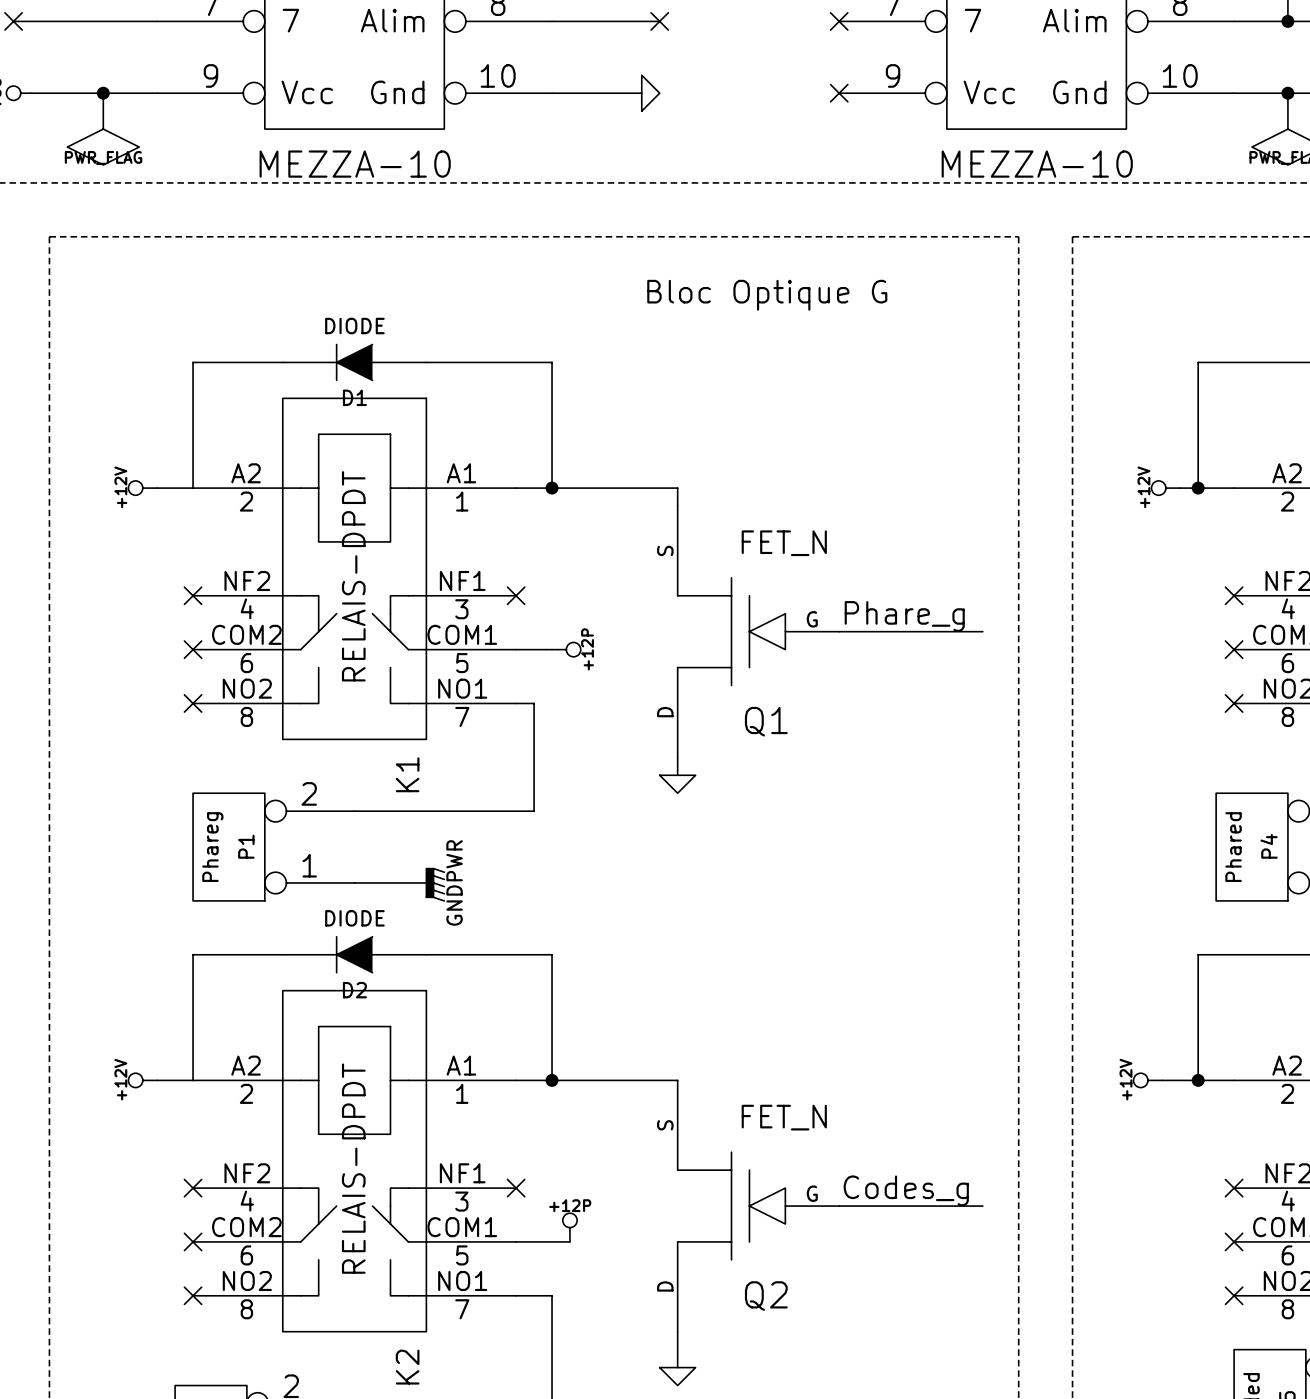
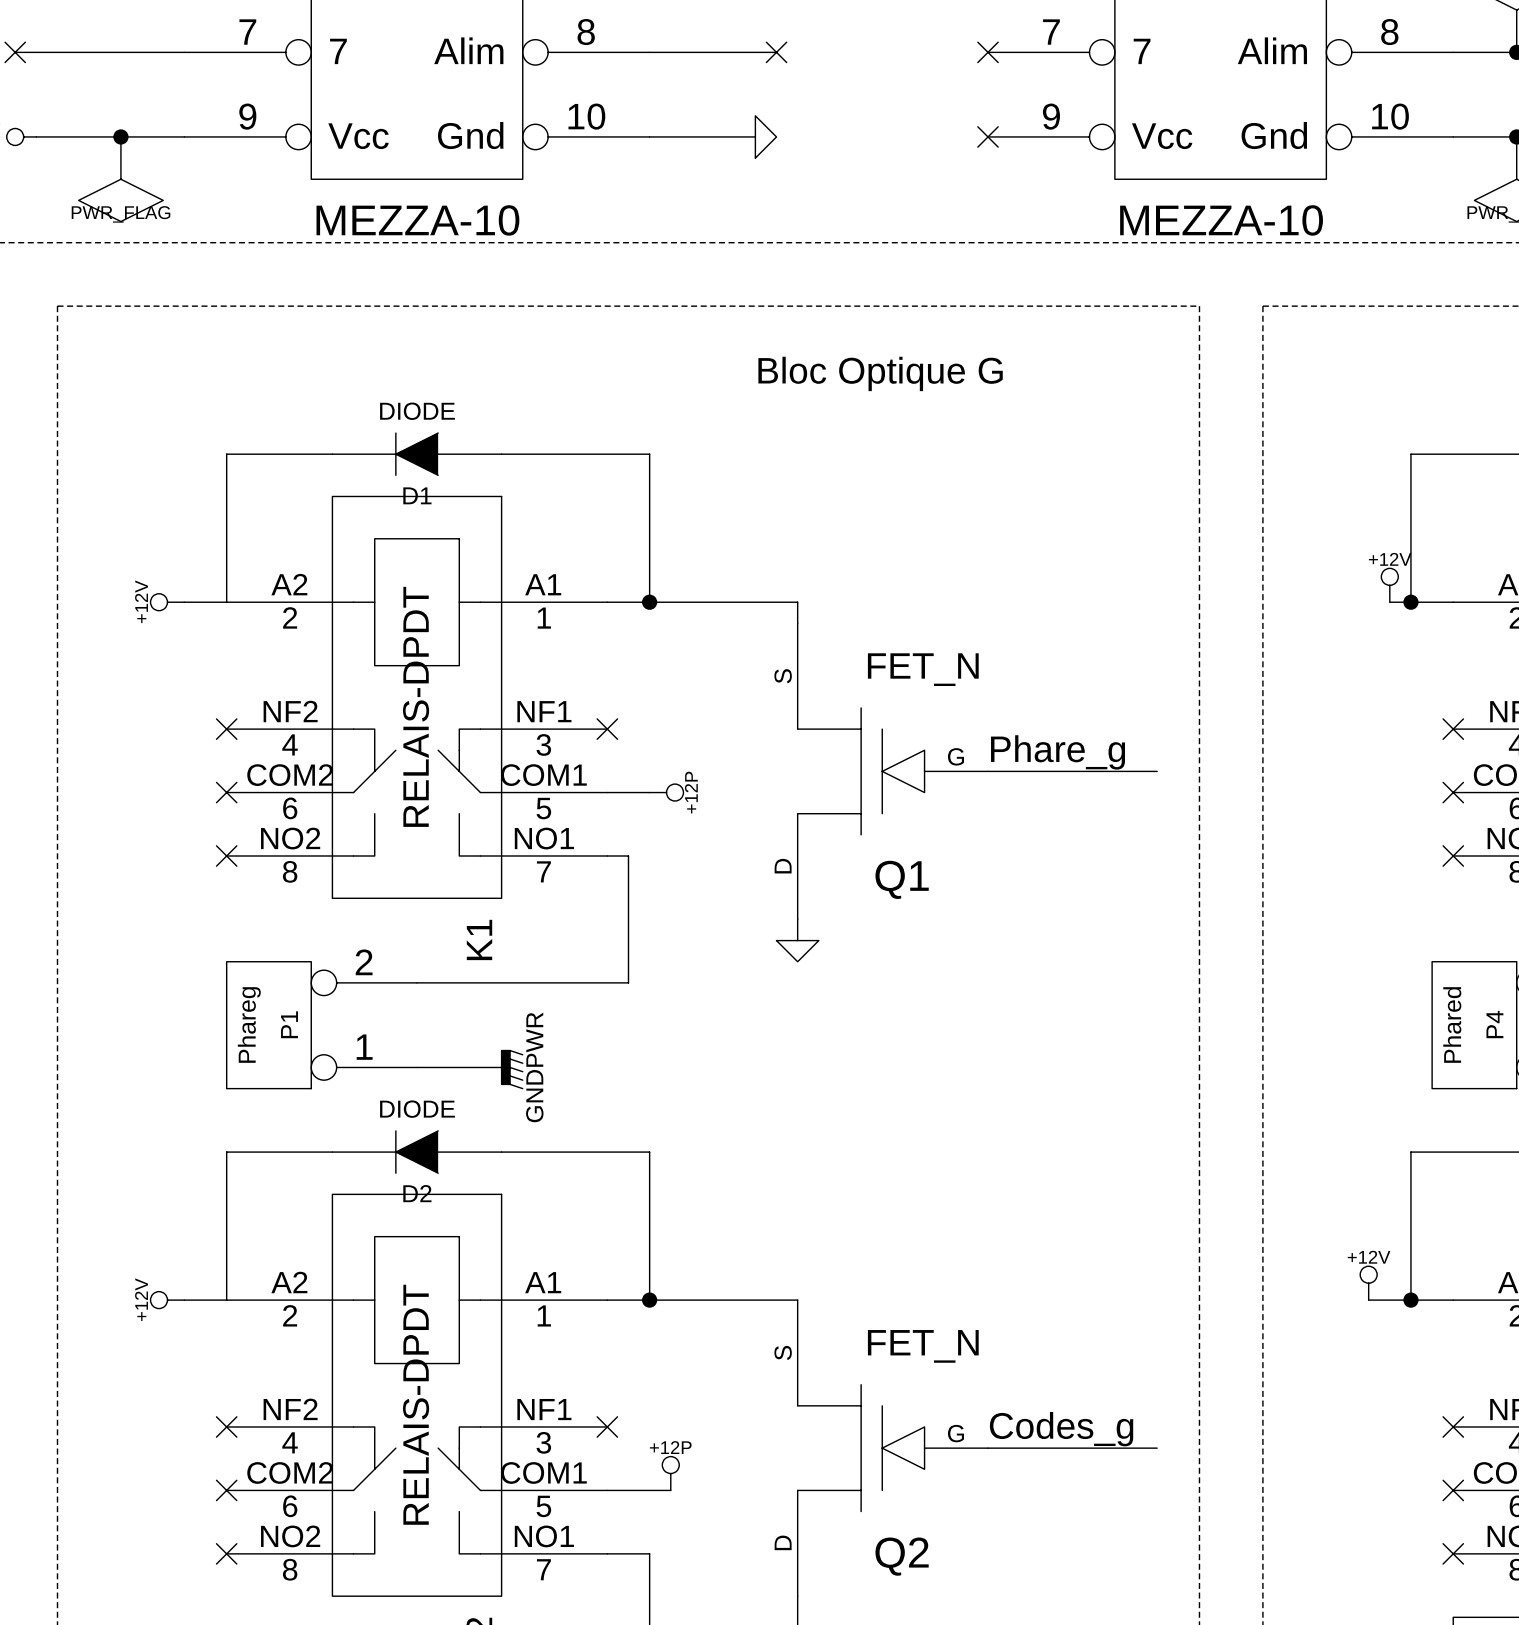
power symbol rotation: 0° (1165, 488) -> 90° clockwise (1389, 585)
power symbol position: +12V (1165, 488) -> +12V (1389, 585)
power symbol rotation: 0° (1147, 1080) -> 90° clockwise (1368, 1283)
power symbol position: +12V (1147, 1080) -> +12V (1368, 1283)

